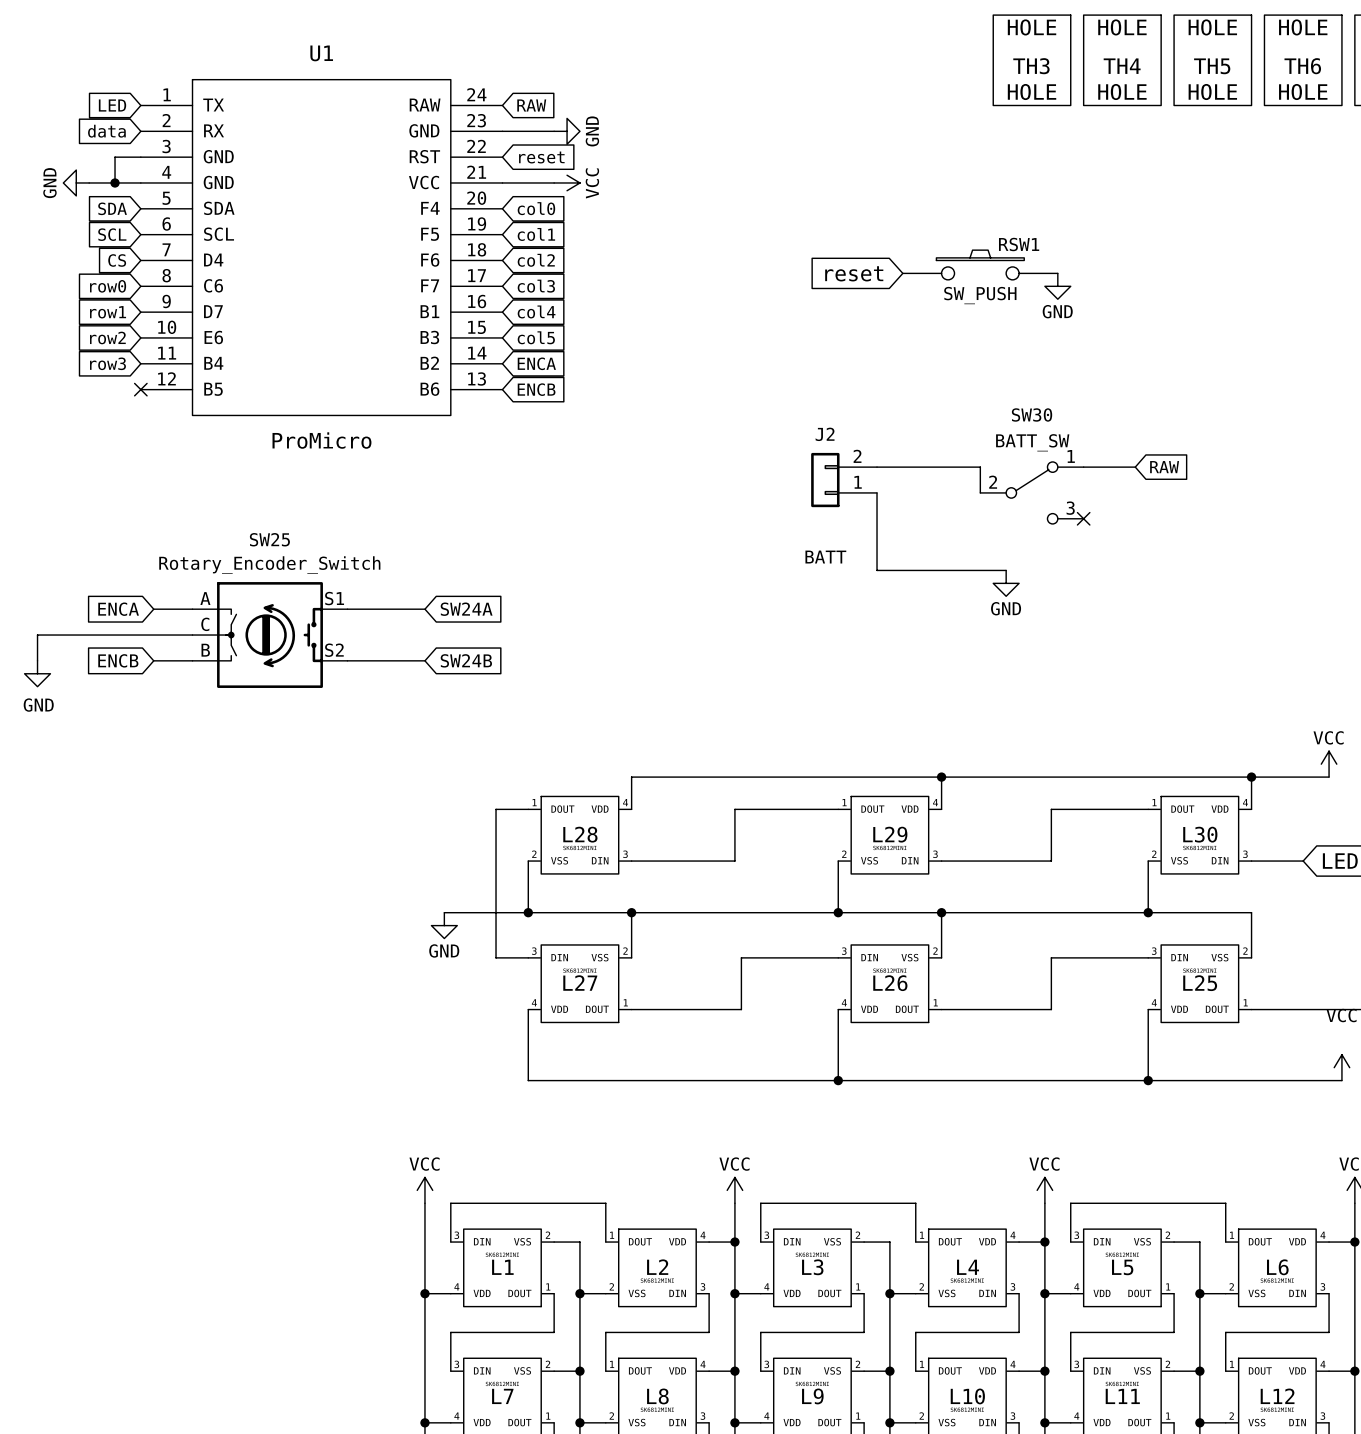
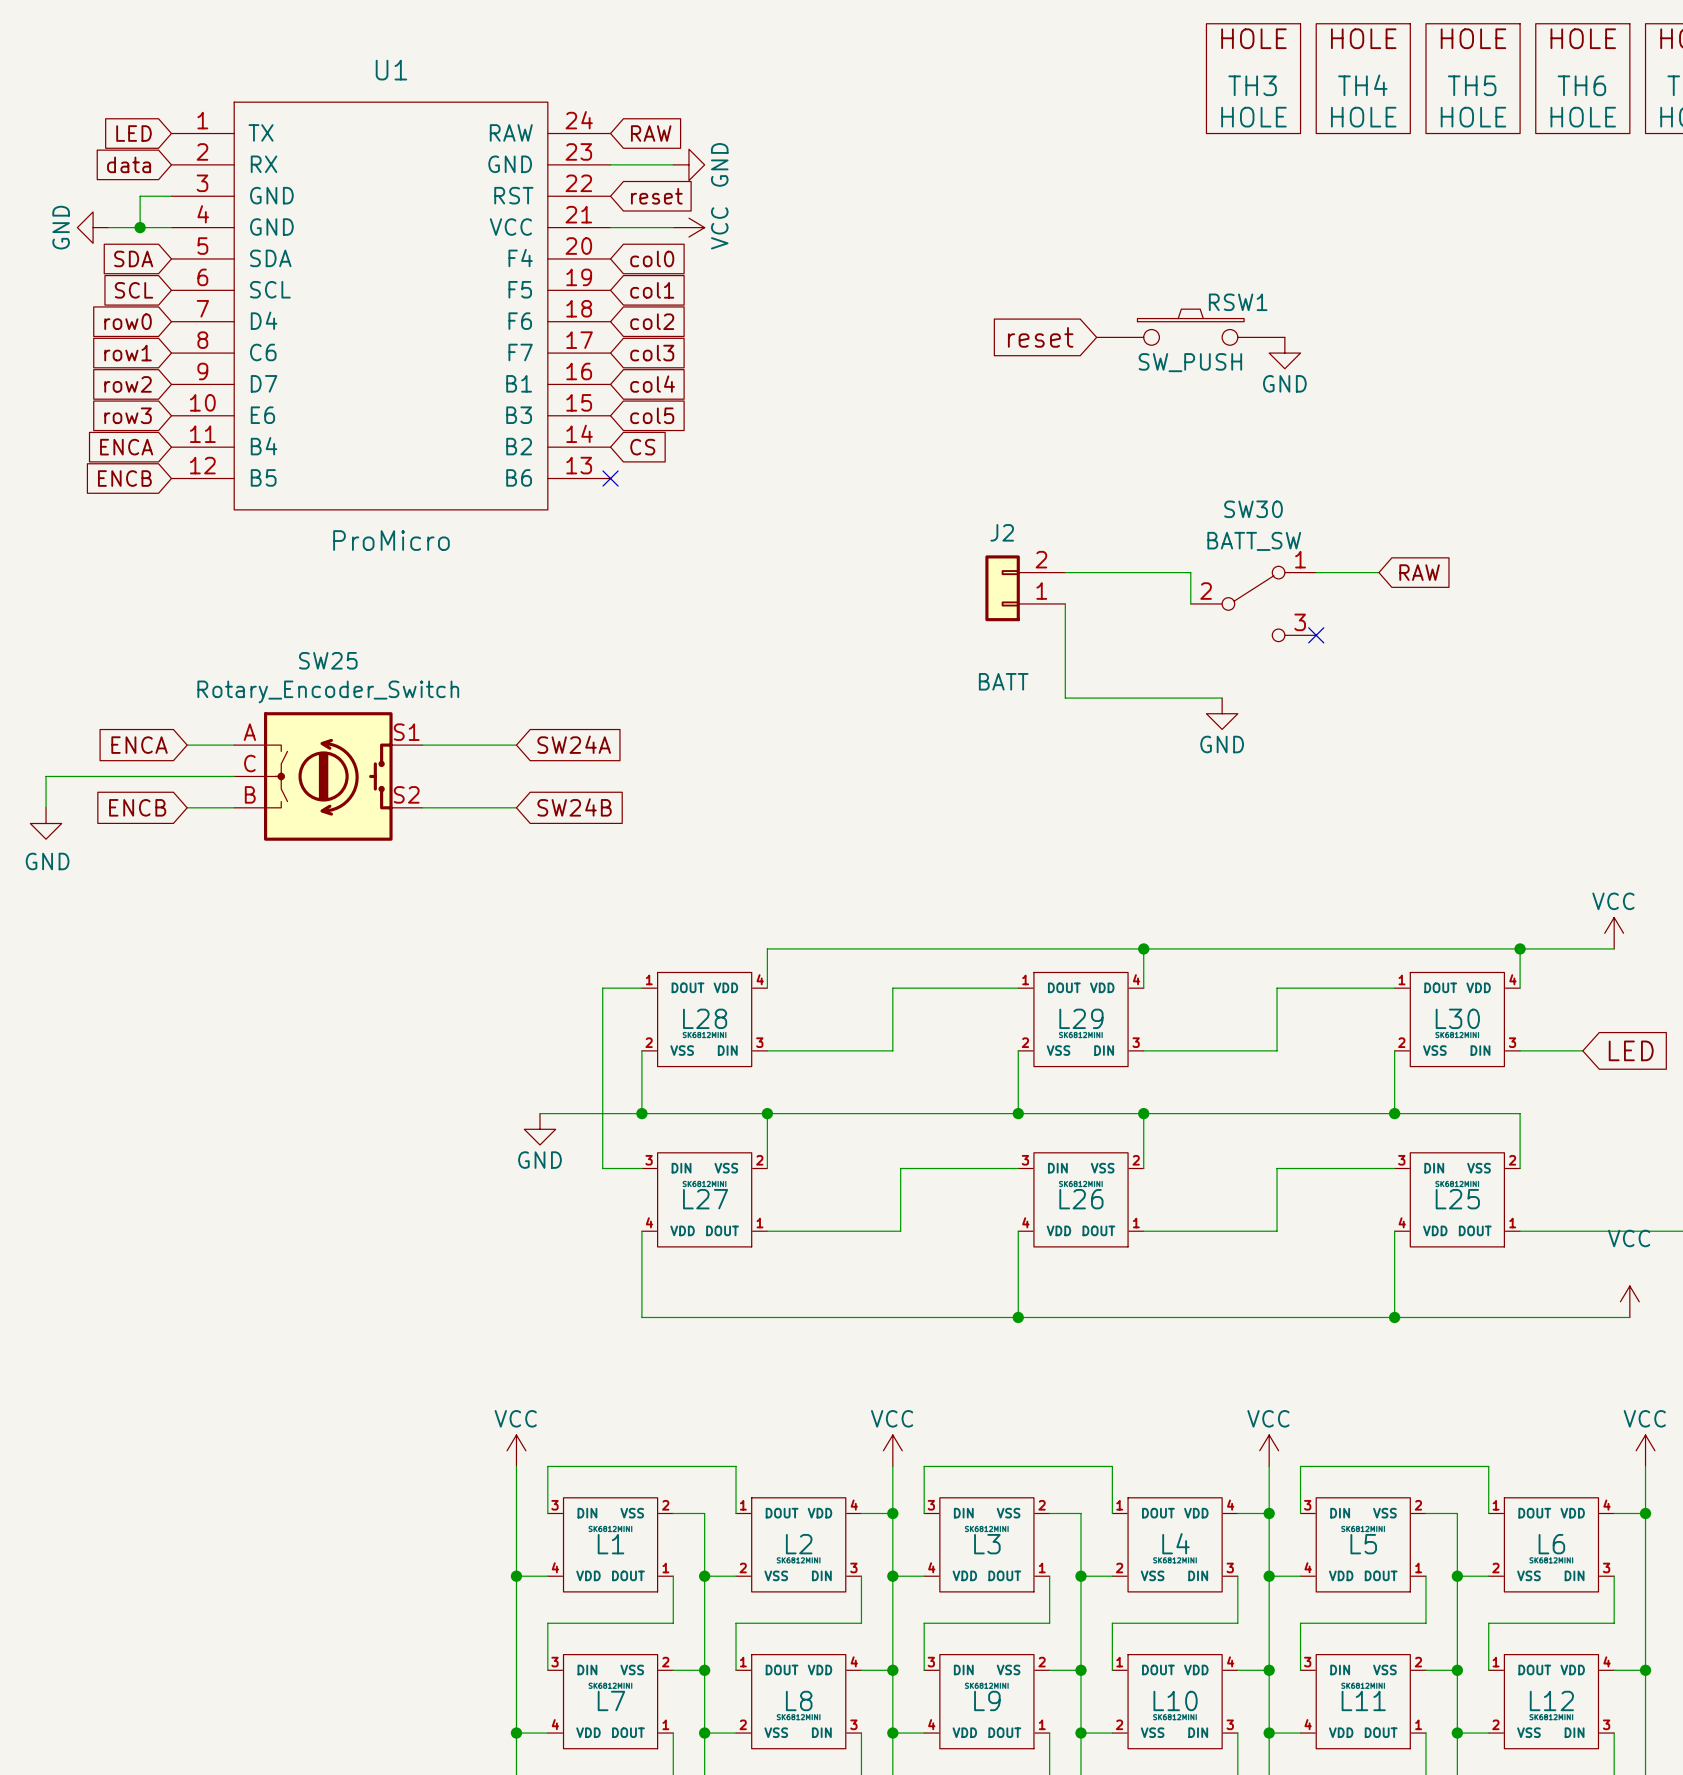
global label: CS (117, 260) -> row0 (128, 321)
global label: row0 (108, 286) -> row1 (128, 353)
global label: row1 (108, 312) -> row2 (128, 384)
global label: row2 (107, 337) -> row3 (128, 415)
global label: row3 (107, 363) -> ENCA (126, 447)
global label: ENCA (536, 363) -> CS (642, 447)
global label: none -> ENCB (124, 478)
no-connect mark: (140, 389) -> none
no-connect mark: none -> (610, 478)
global label: ENCB (536, 389) -> none

